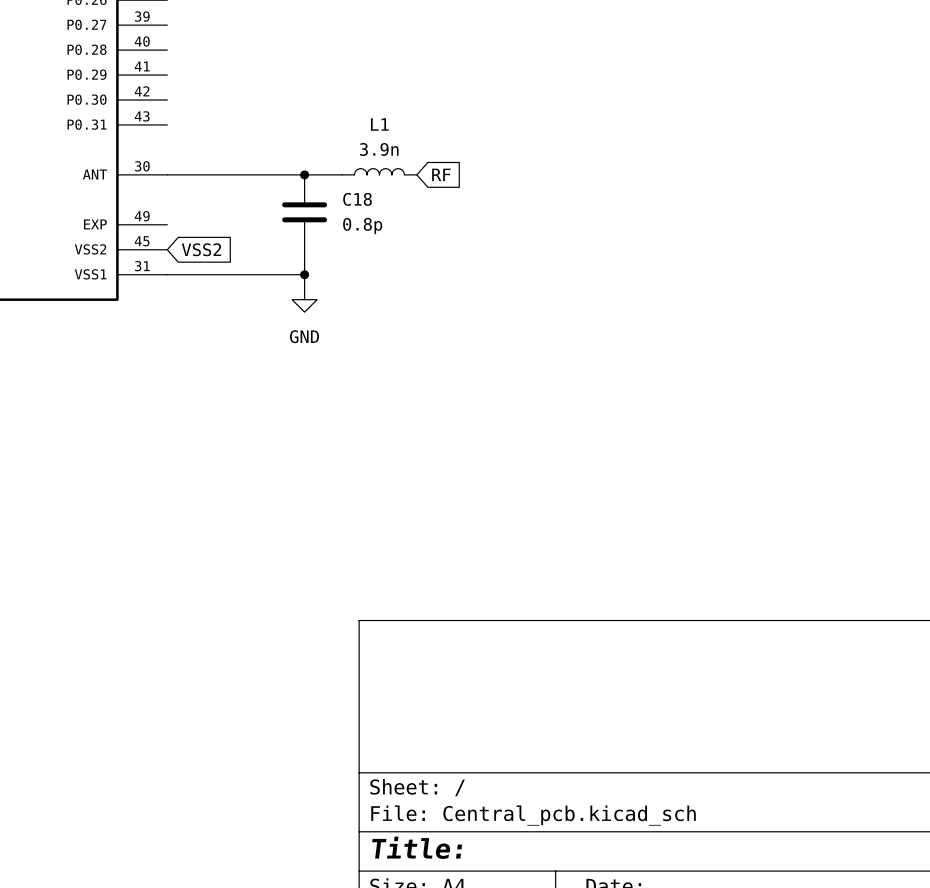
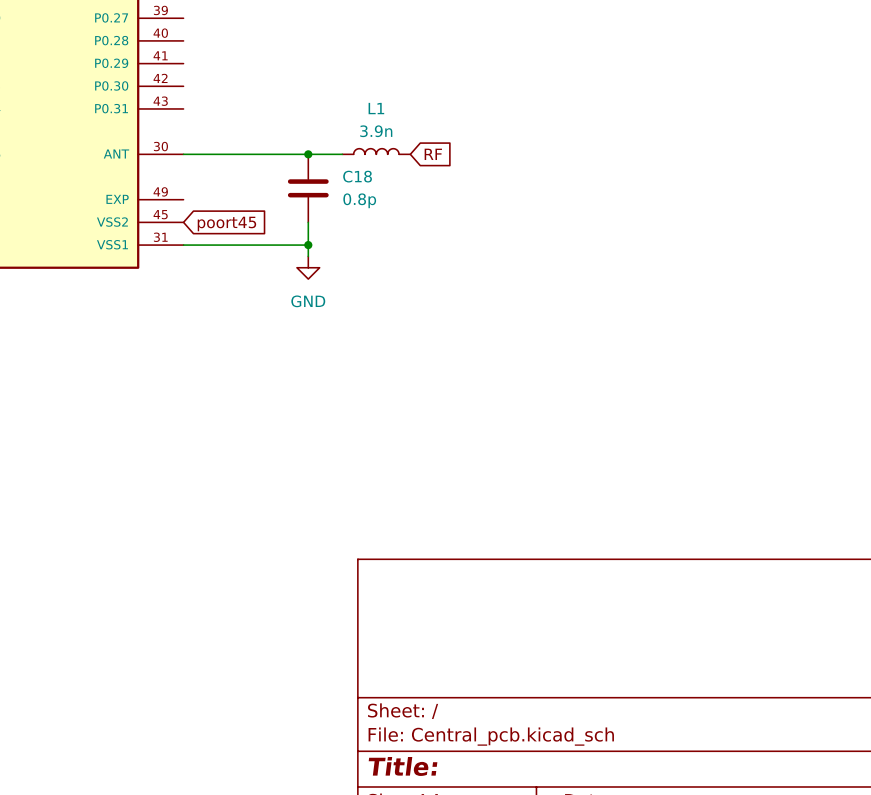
global label: VSS2 (201, 249) -> poort45 (226, 224)

